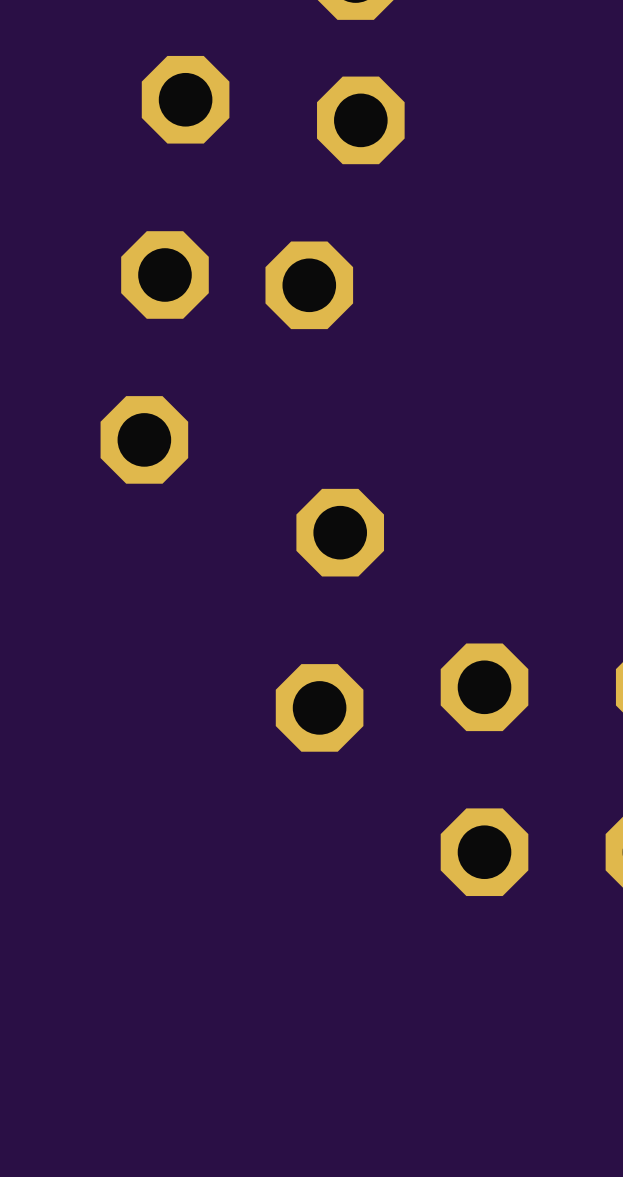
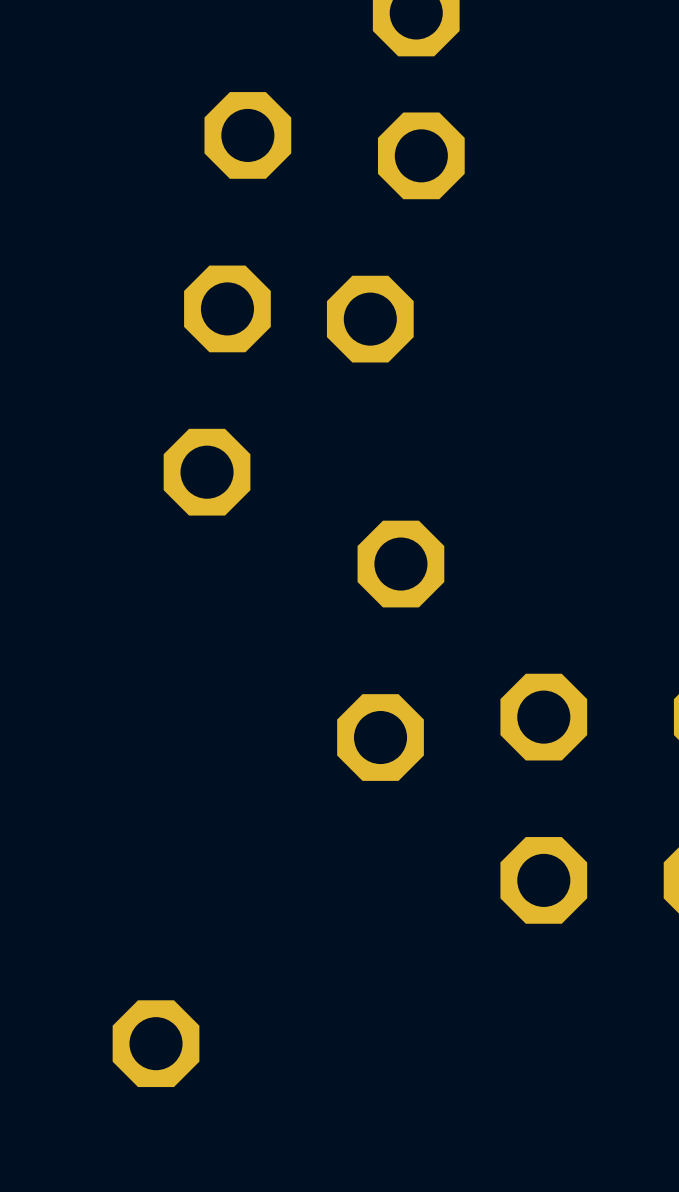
part: none -> (156, 1043)

